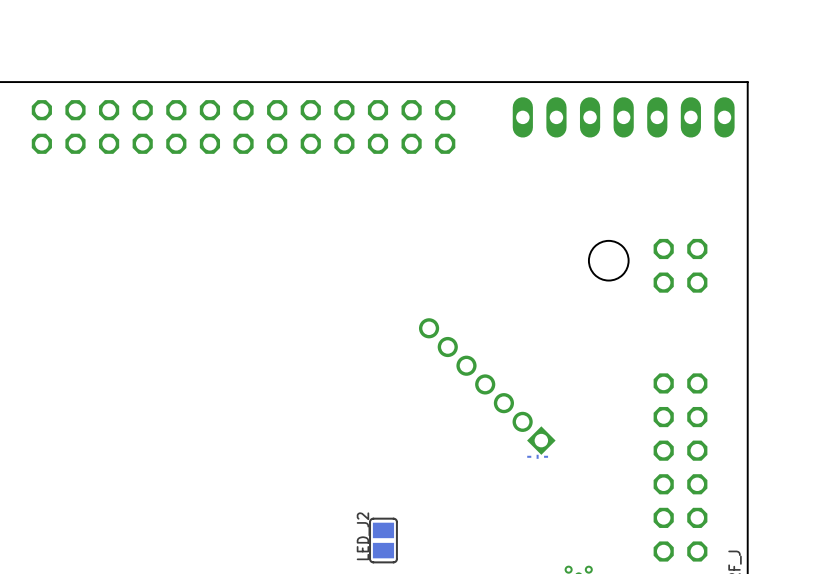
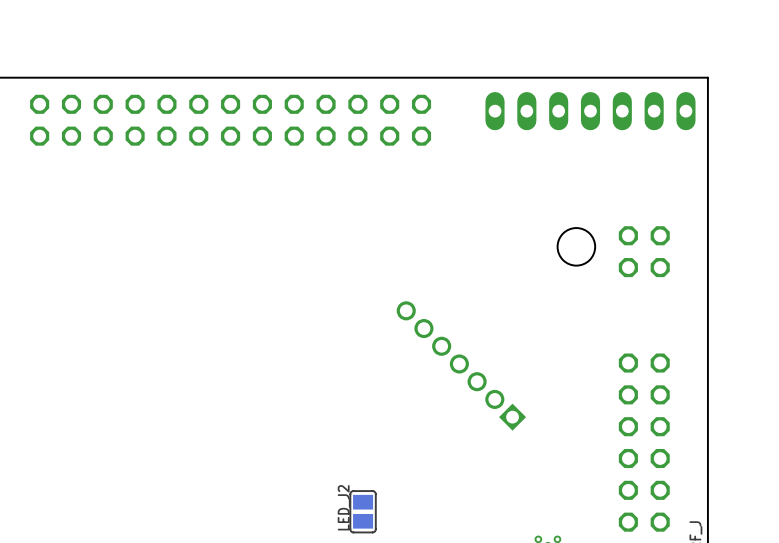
part: (537, 456) -> none

